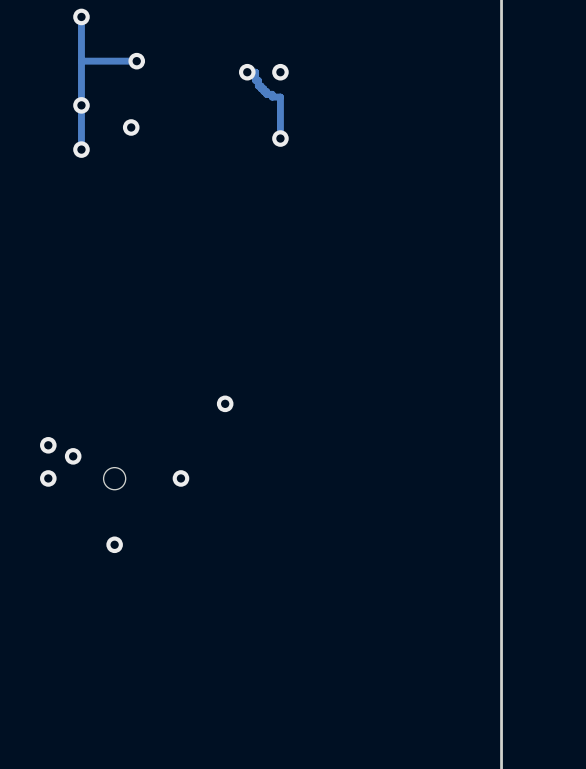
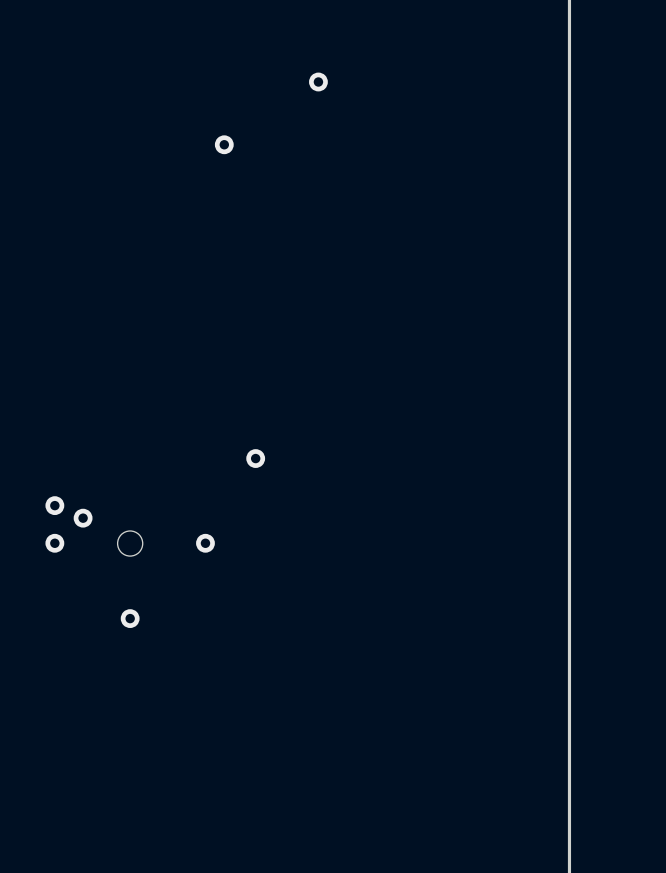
track: (81, 16) (81, 149) -> none
via: (81, 16) -> none
track: (136, 61) (81, 61) -> none
via: (136, 61) -> none
track: (247, 72) (255, 72) (255, 80) (258, 80) (258, 86) (261, 86) (261, 88) (266, 91) (266, 94) (272, 94) (272, 97) (280, 97) (280, 138) -> none
via: (247, 72) -> none
via: (81, 105) -> none
via: (131, 127) -> none
via: none -> (224, 144)
via: (280, 138) -> none
via: (81, 149) -> none

